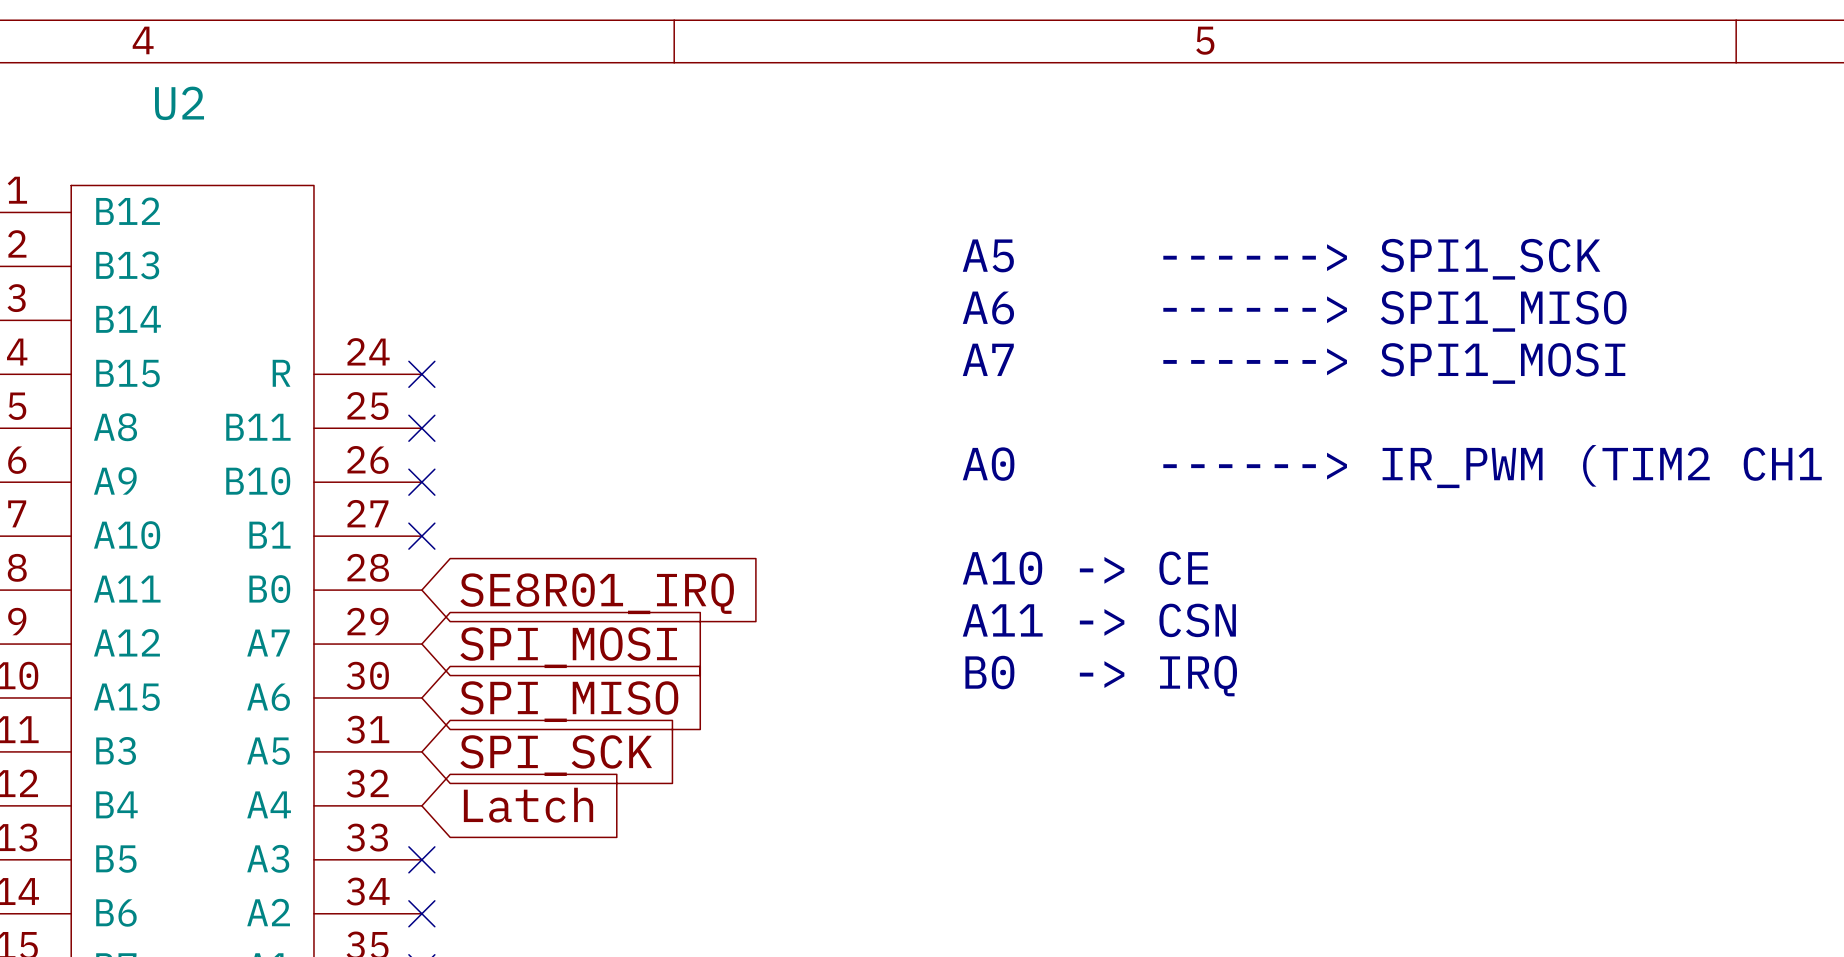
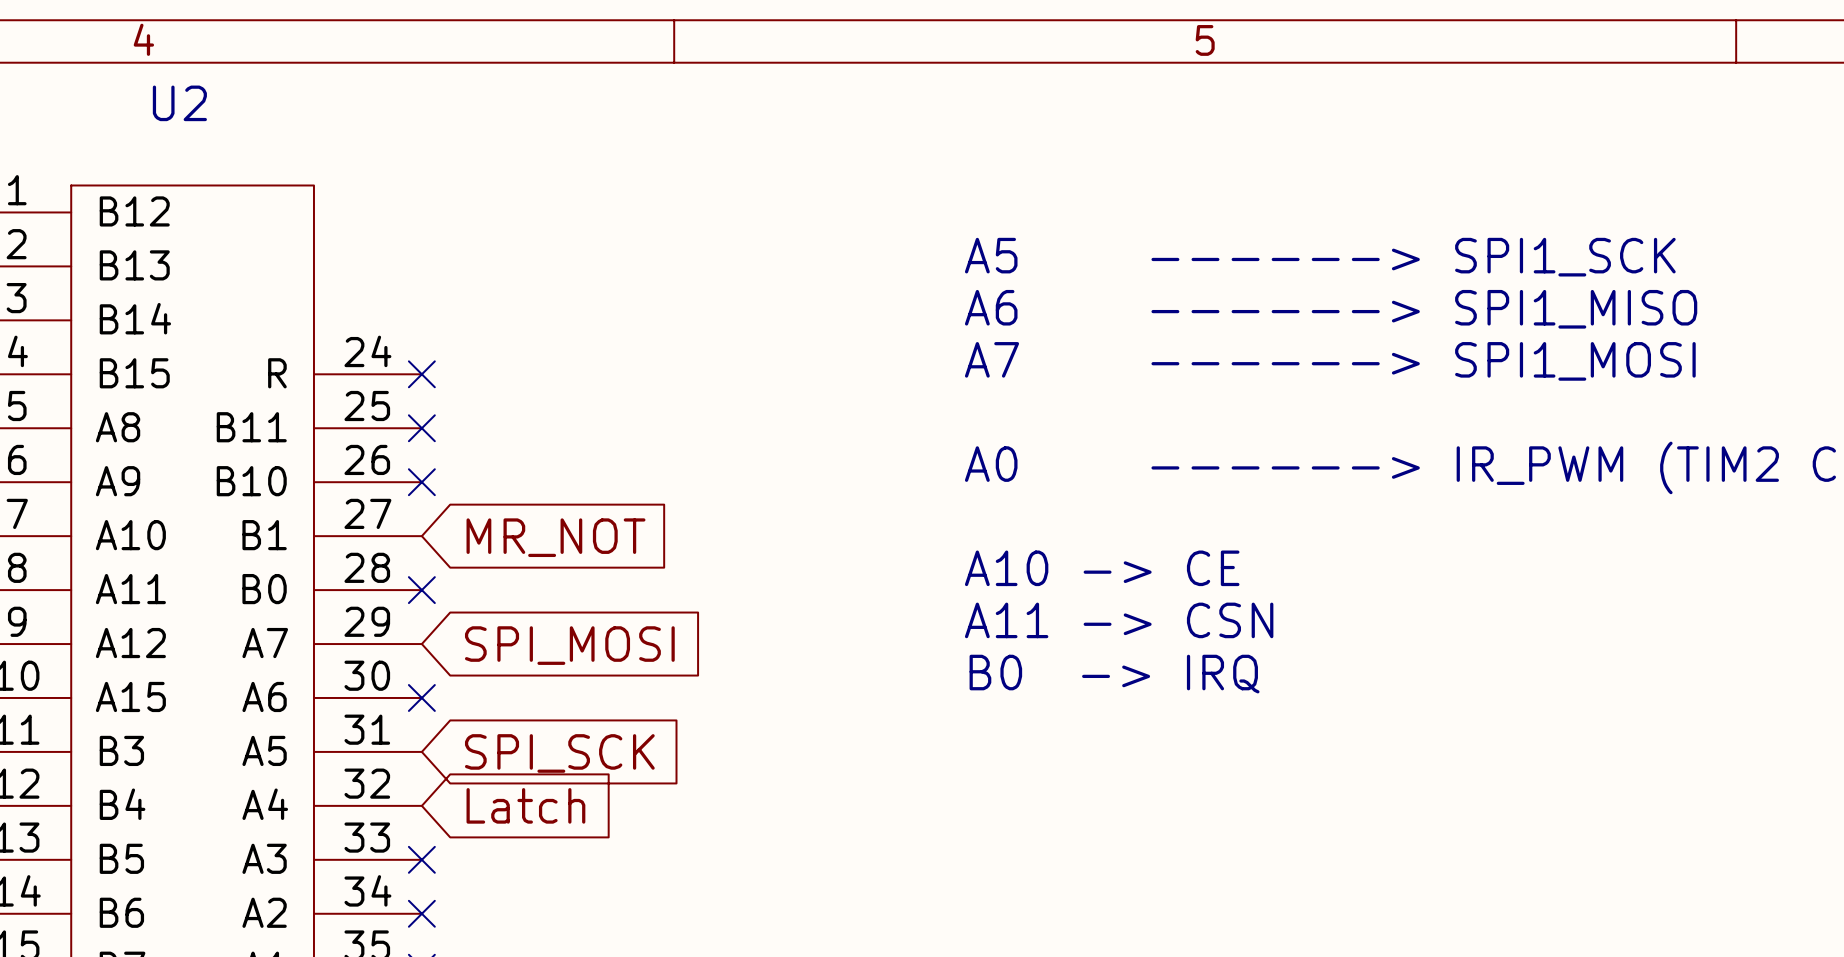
no-connect mark position: (421, 536) -> (421, 590)
global label: none -> MR_NOT (555, 537)
global label: SE8R01_IRQ (597, 593) -> none
no-connect mark: none -> (421, 697)
global label: SPI_MISO (569, 701) -> none

